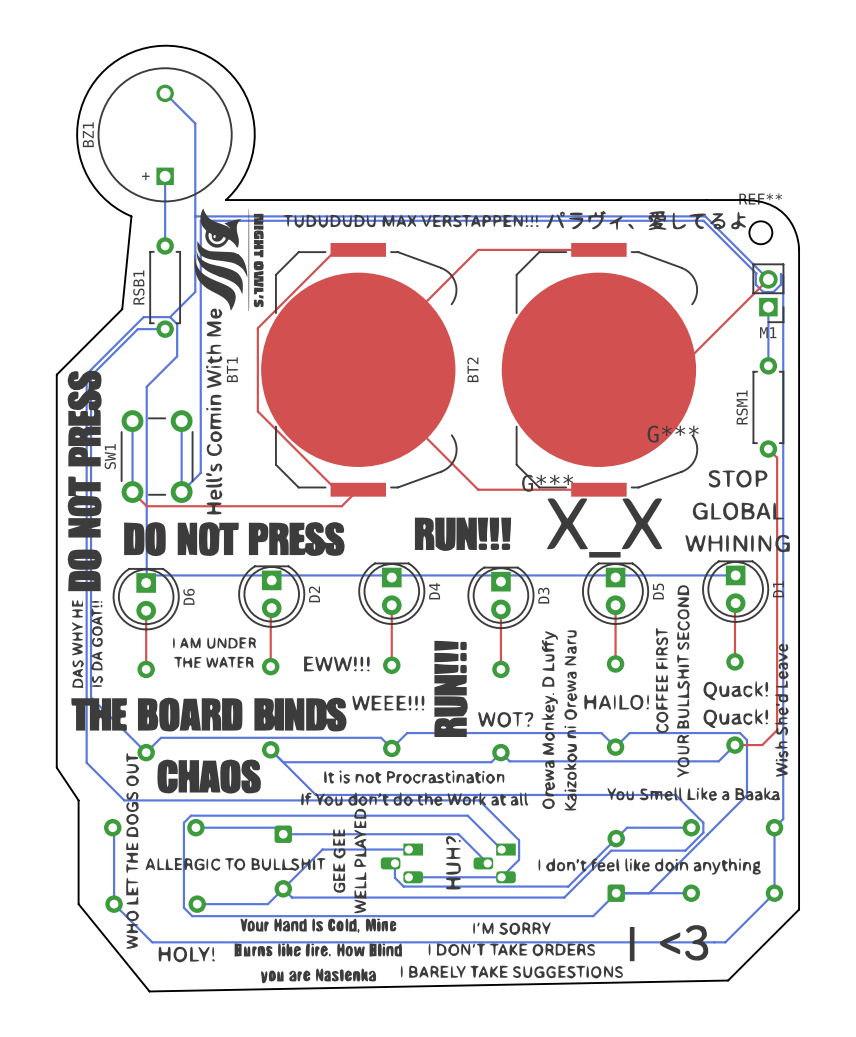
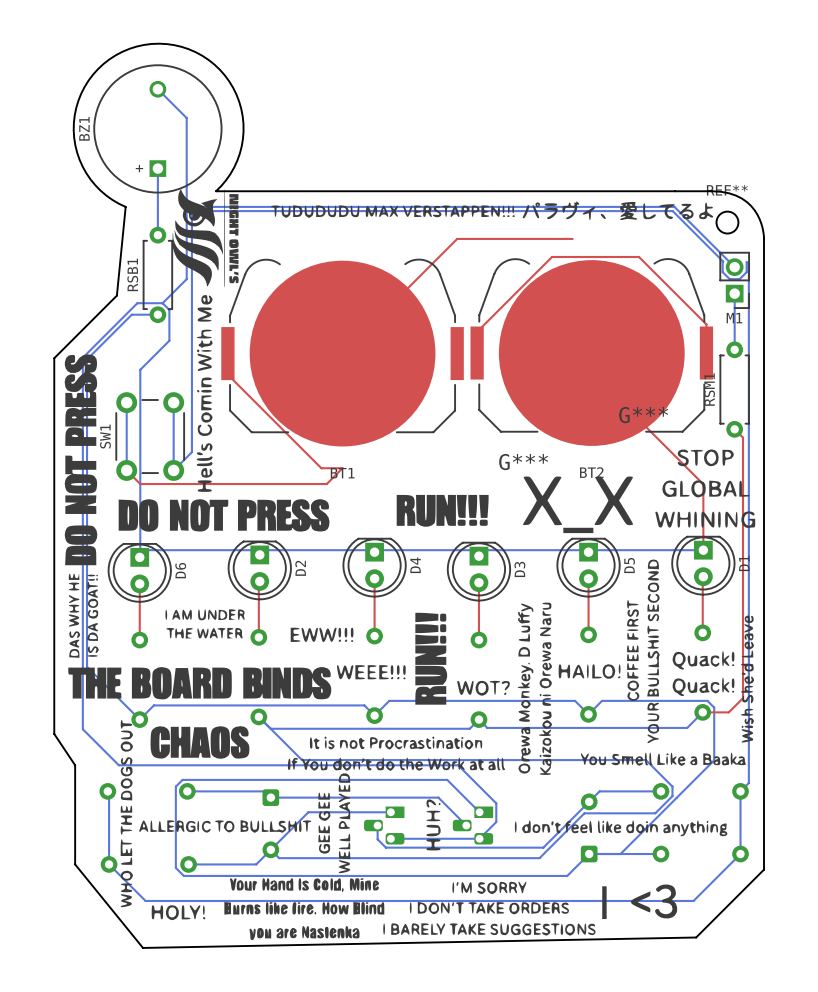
top track: (358, 249) (336, 249) (257, 328) (257, 411) -> (227, 353) (227, 374) (246, 393)
drawing position: (229, 260) -> (205, 238)
top track: (768, 279) (677, 369) -> none
top track: (358, 369) (478, 489) (598, 489) -> none
BT1 rotation: 0° (359, 369) -> 90° counterclockwise (342, 352)
top track: none -> (477, 353) (477, 331) (552, 257) (639, 257) (706, 324) (706, 353)
top track: none -> (572, 353) (703, 484) (703, 550)
BT2 rotation: 0° (599, 369) -> 90° counterclockwise (591, 352)

